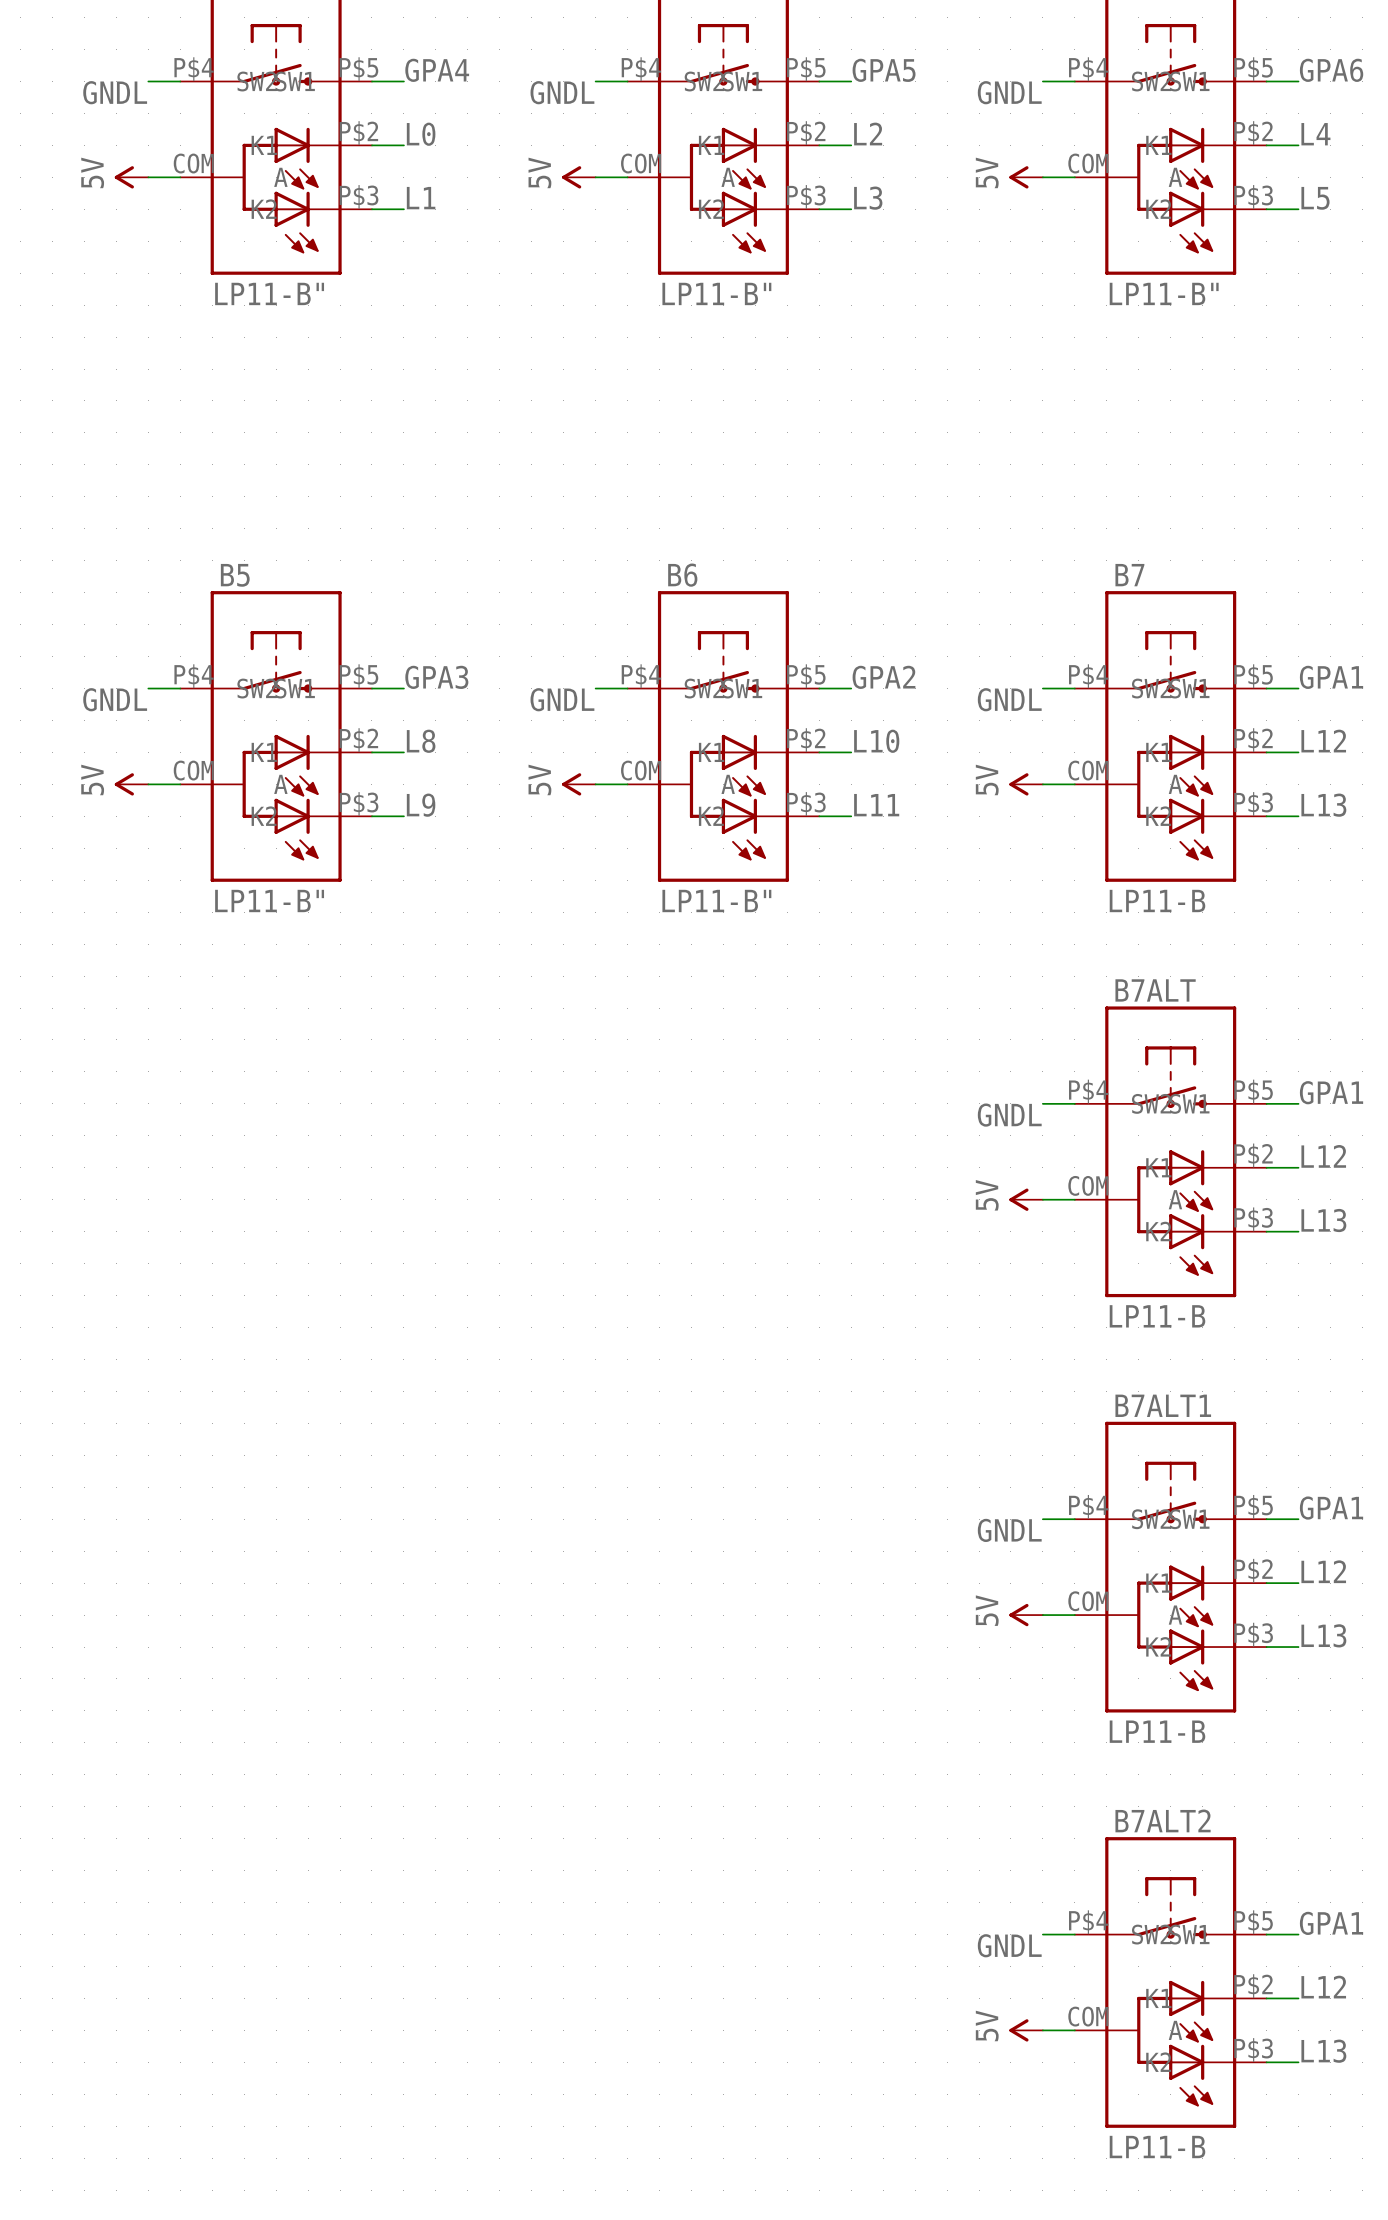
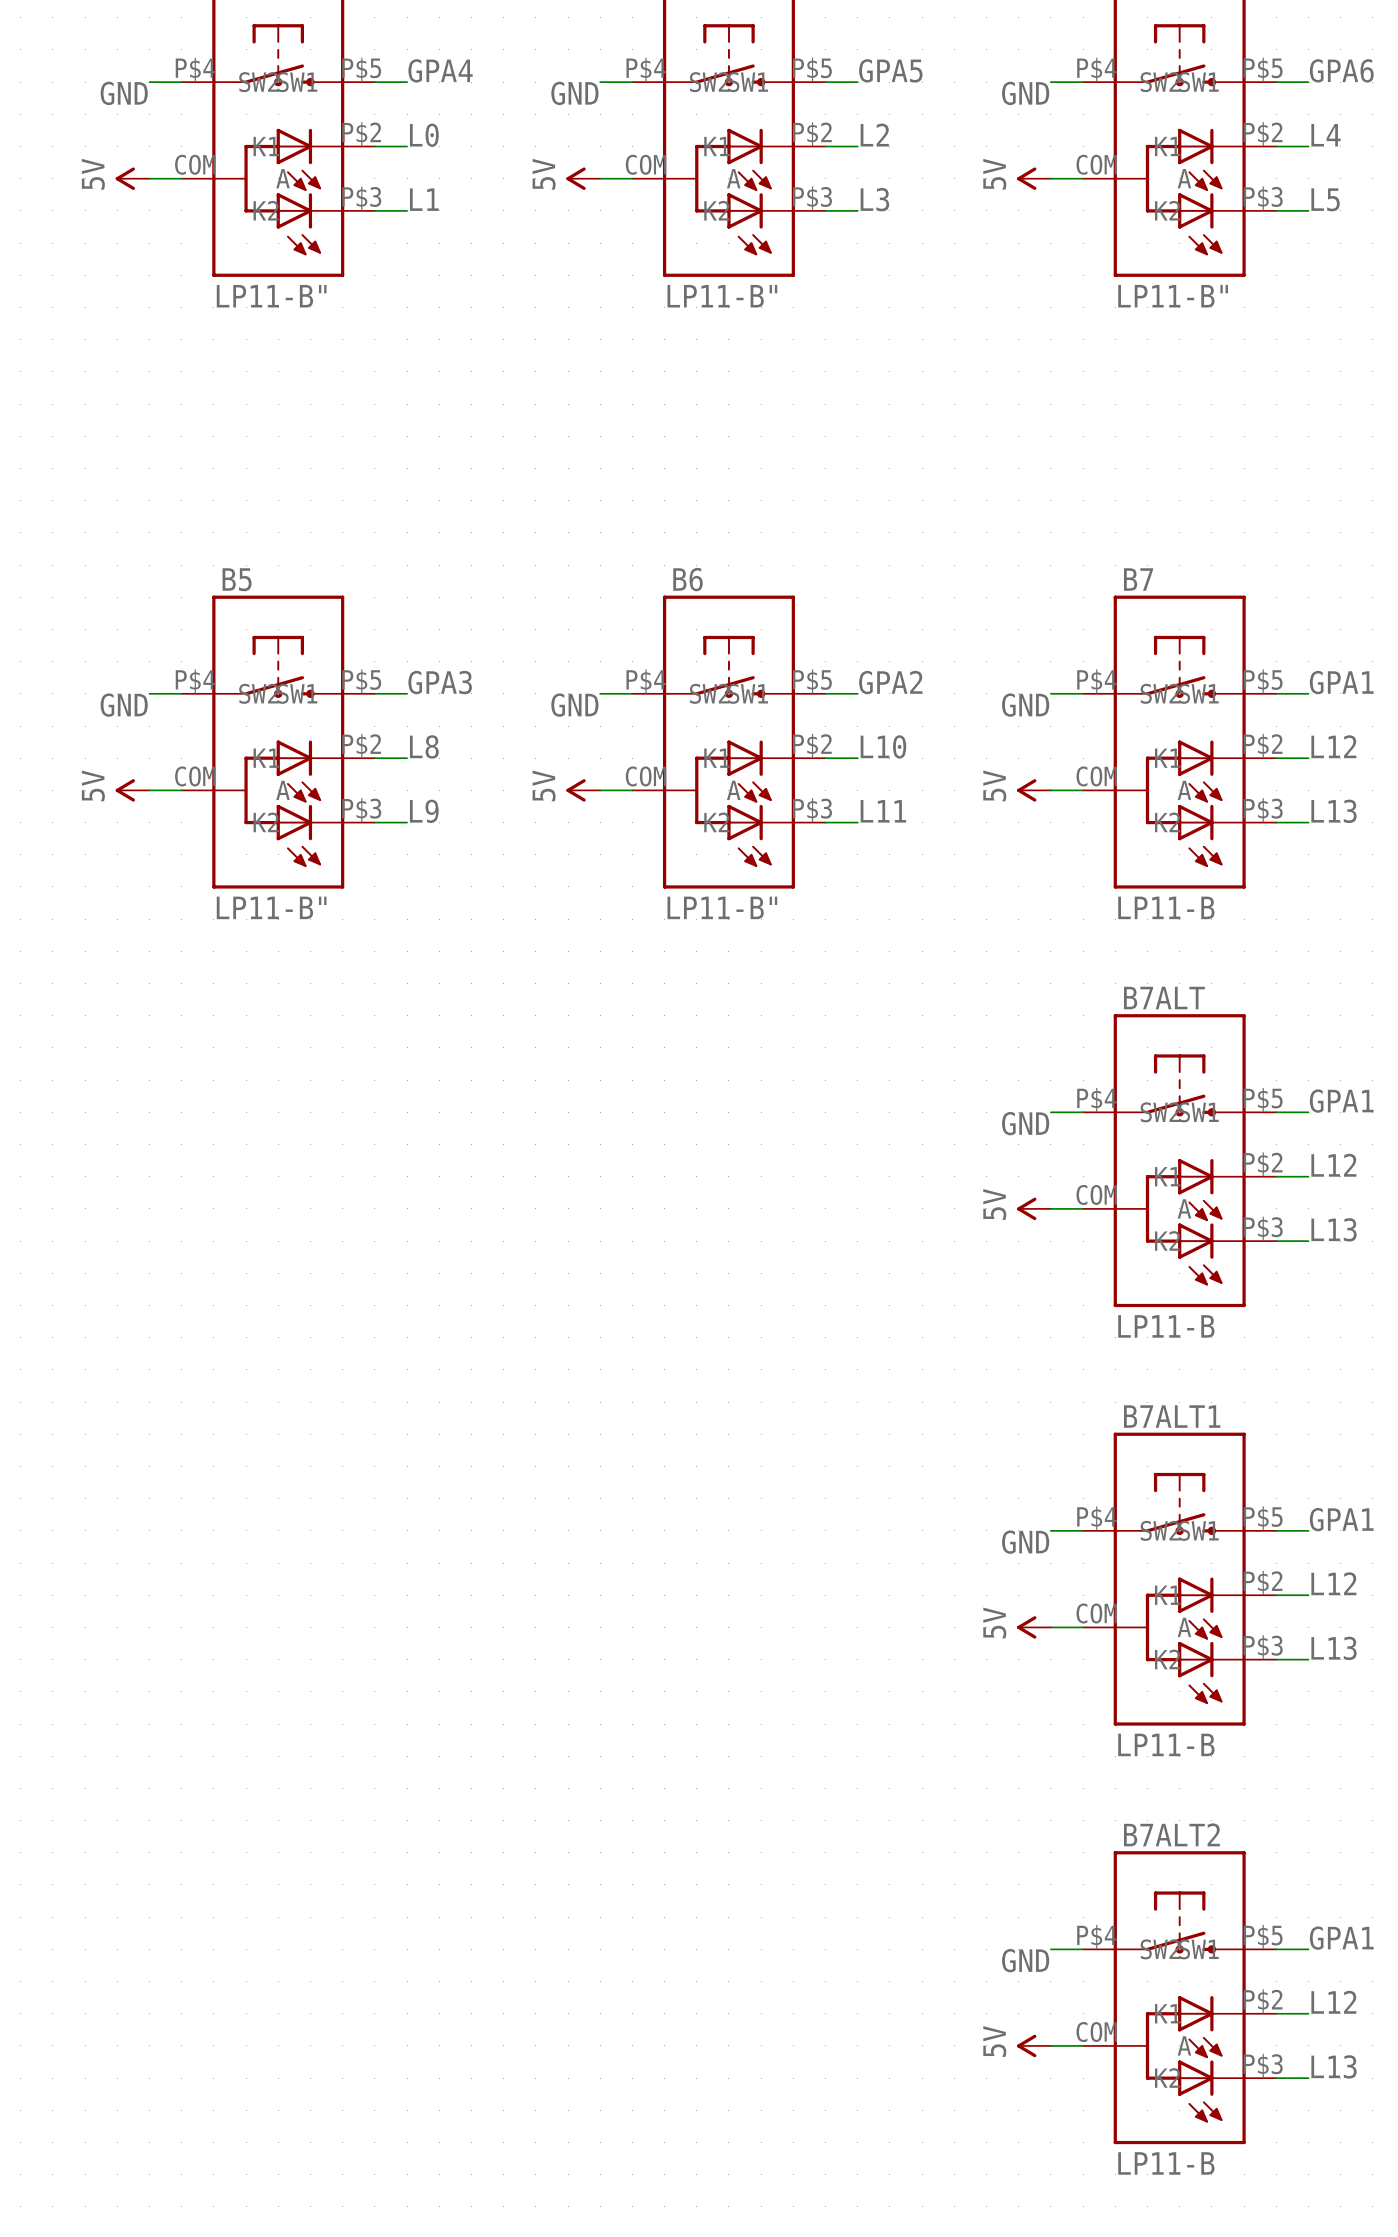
label: GNDL (115, 92) -> GND (124, 93)
label: GNDL (562, 92) -> GND (574, 93)
label: GNDL (1009, 92) -> GND (1025, 93)
label: GNDL (115, 699) -> GND (124, 705)
label: GNDL (562, 699) -> GND (574, 705)
label: GNDL (1009, 699) -> GND (1025, 705)
label: GNDL (1009, 1115) -> GND (1025, 1123)
label: GNDL (1009, 1530) -> GND (1025, 1542)
label: GNDL (1009, 1945) -> GND (1025, 1960)

